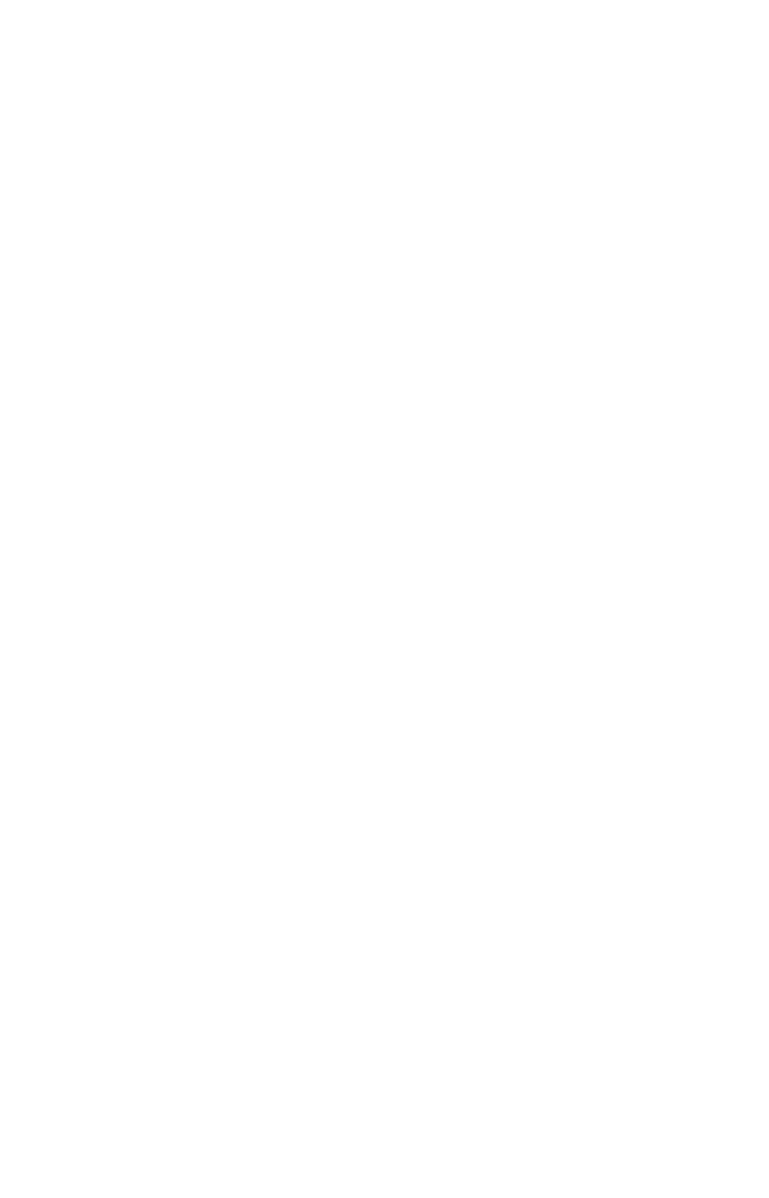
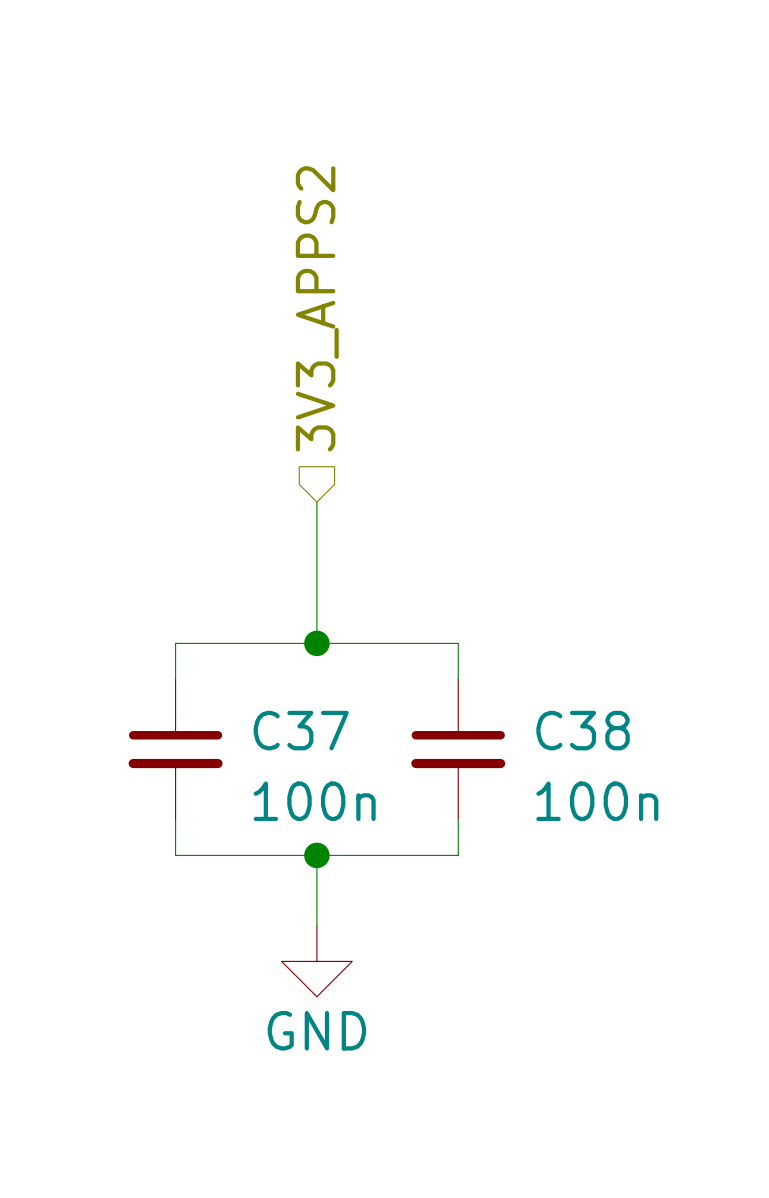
hierarchical label: none -> 3V3_APPS2 (317, 308)
wire: none -> (316, 502) (316, 643)
junction: none -> (316, 643)
wire: none -> (175, 678) (175, 643) (458, 643) (458, 678)
C37: none -> 100n (175, 749)
C38: none -> 100n (458, 749)
wire: none -> (175, 820) (175, 855) (458, 855) (458, 820)
wire: none -> (316, 855) (316, 926)
junction: none -> (316, 855)
power symbol: none -> GND (316, 961)

